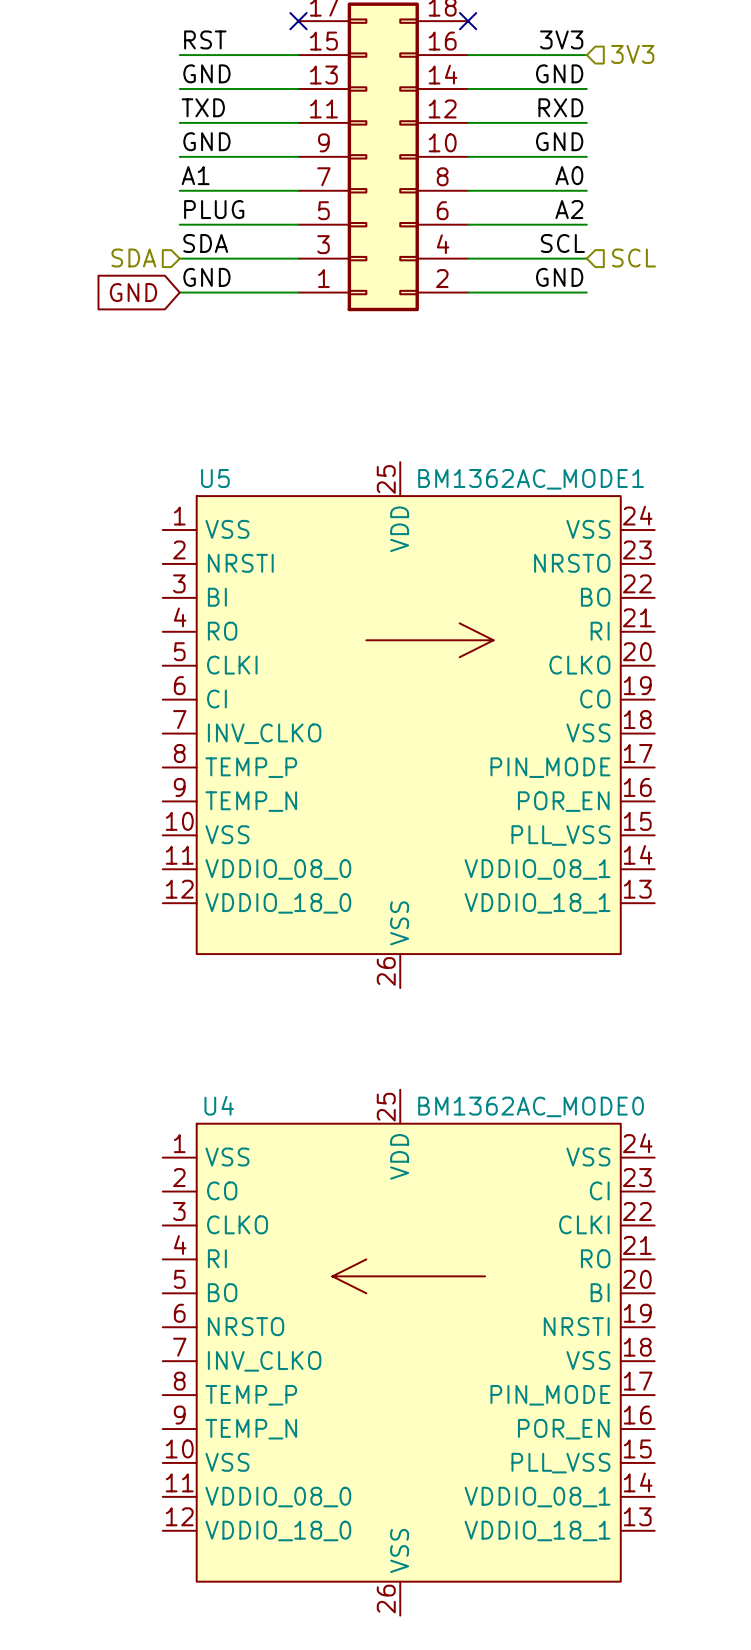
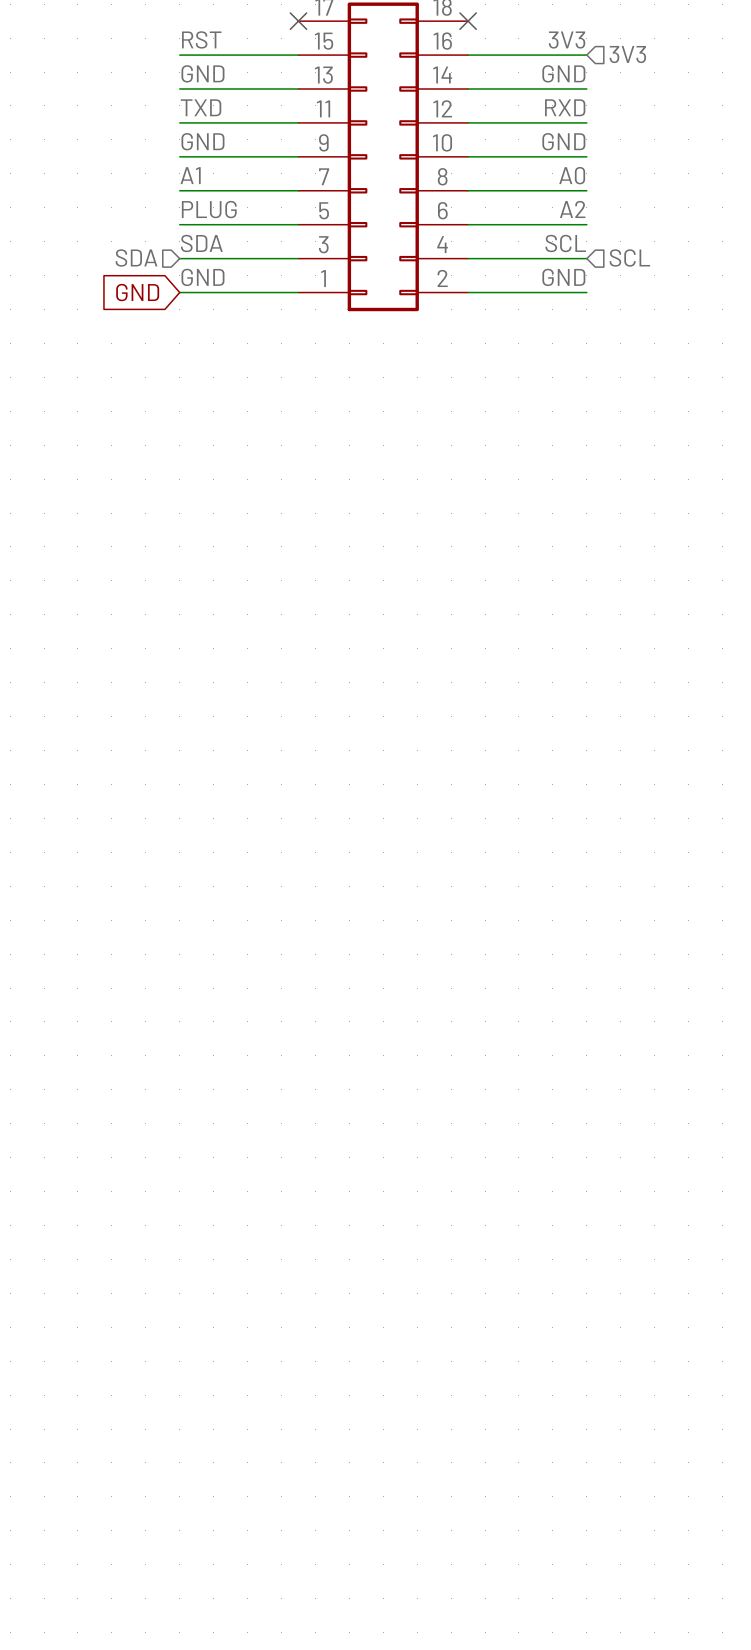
U5: BM1362AC_MODE1 (408, 725) -> none
U4: BM1362AC_MODE0 (408, 1352) -> none

